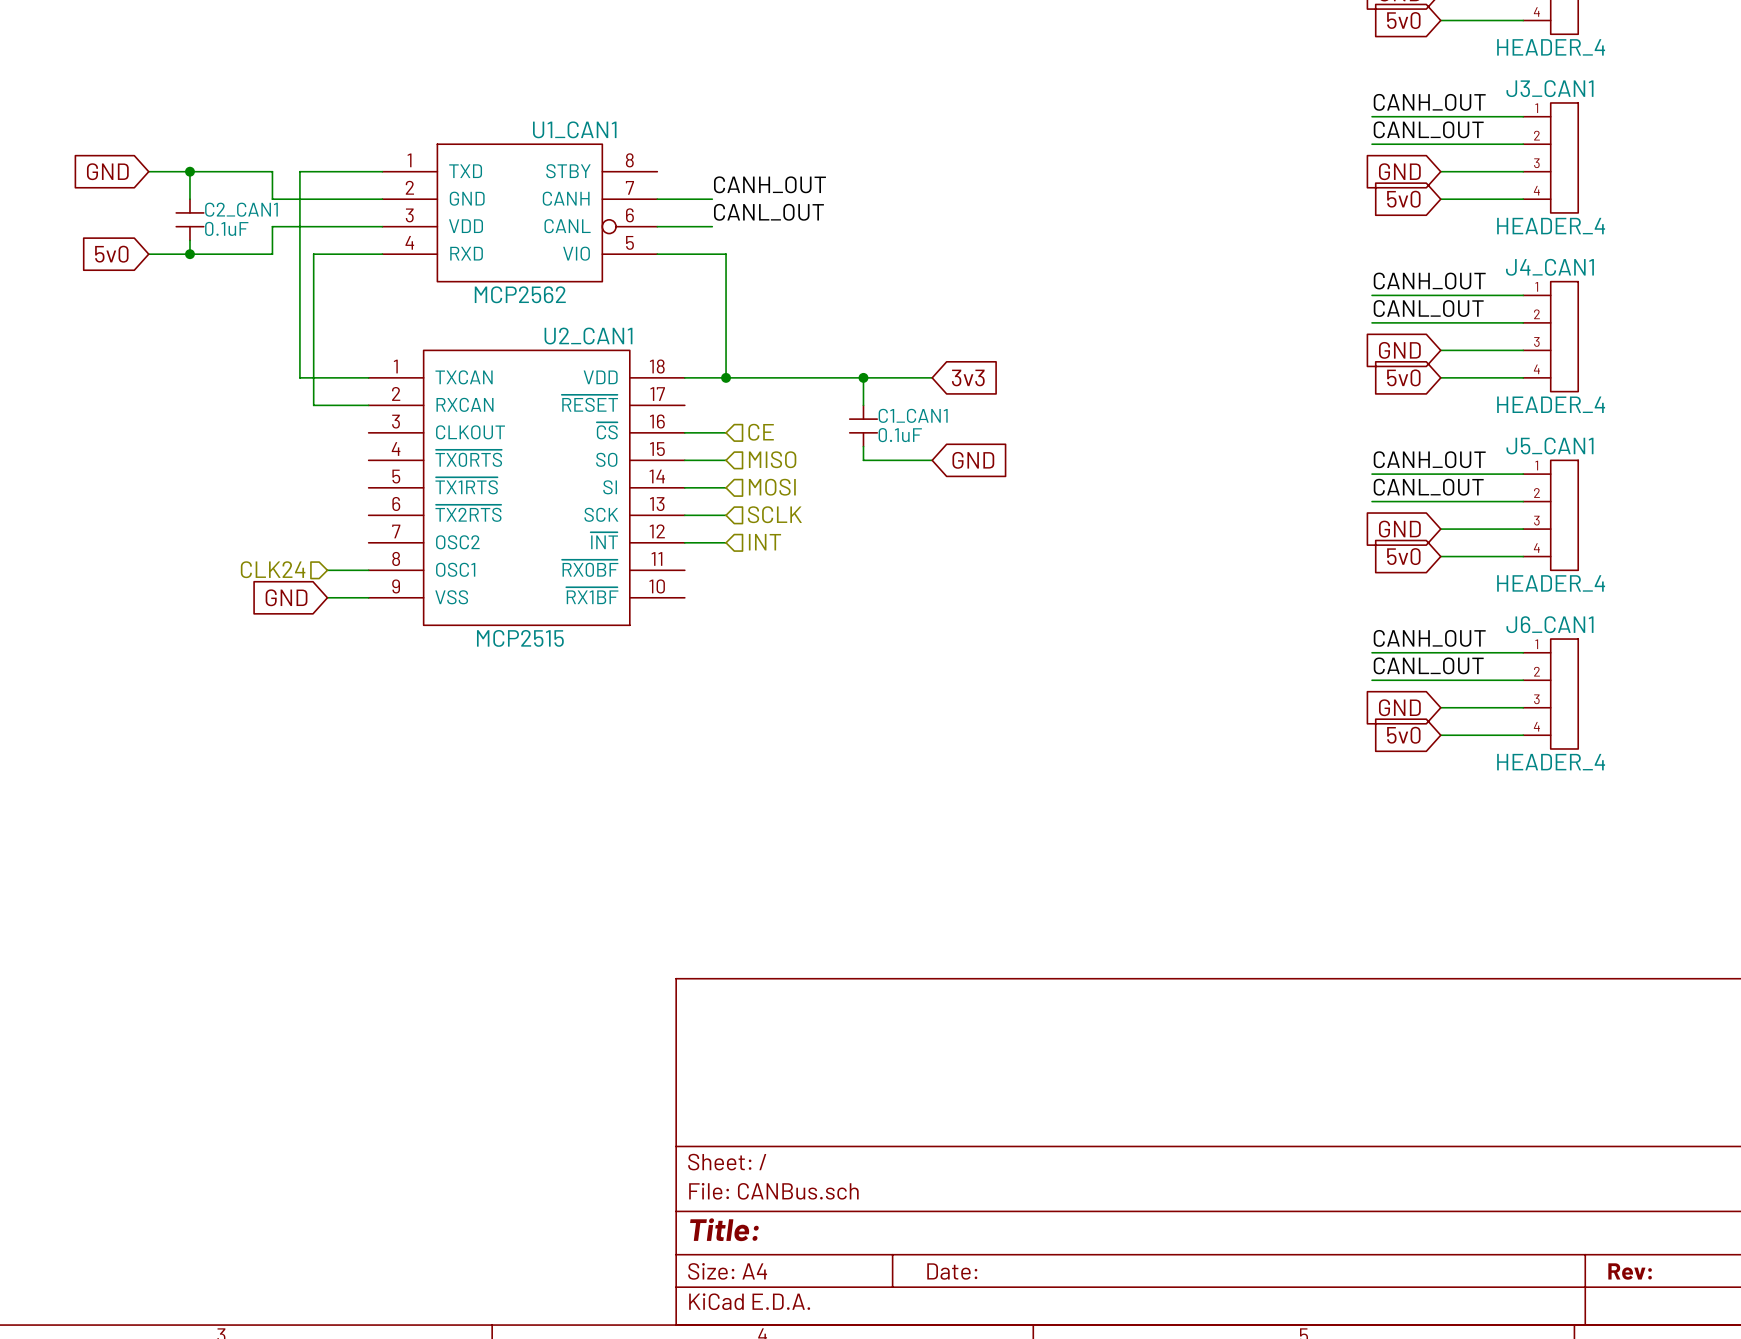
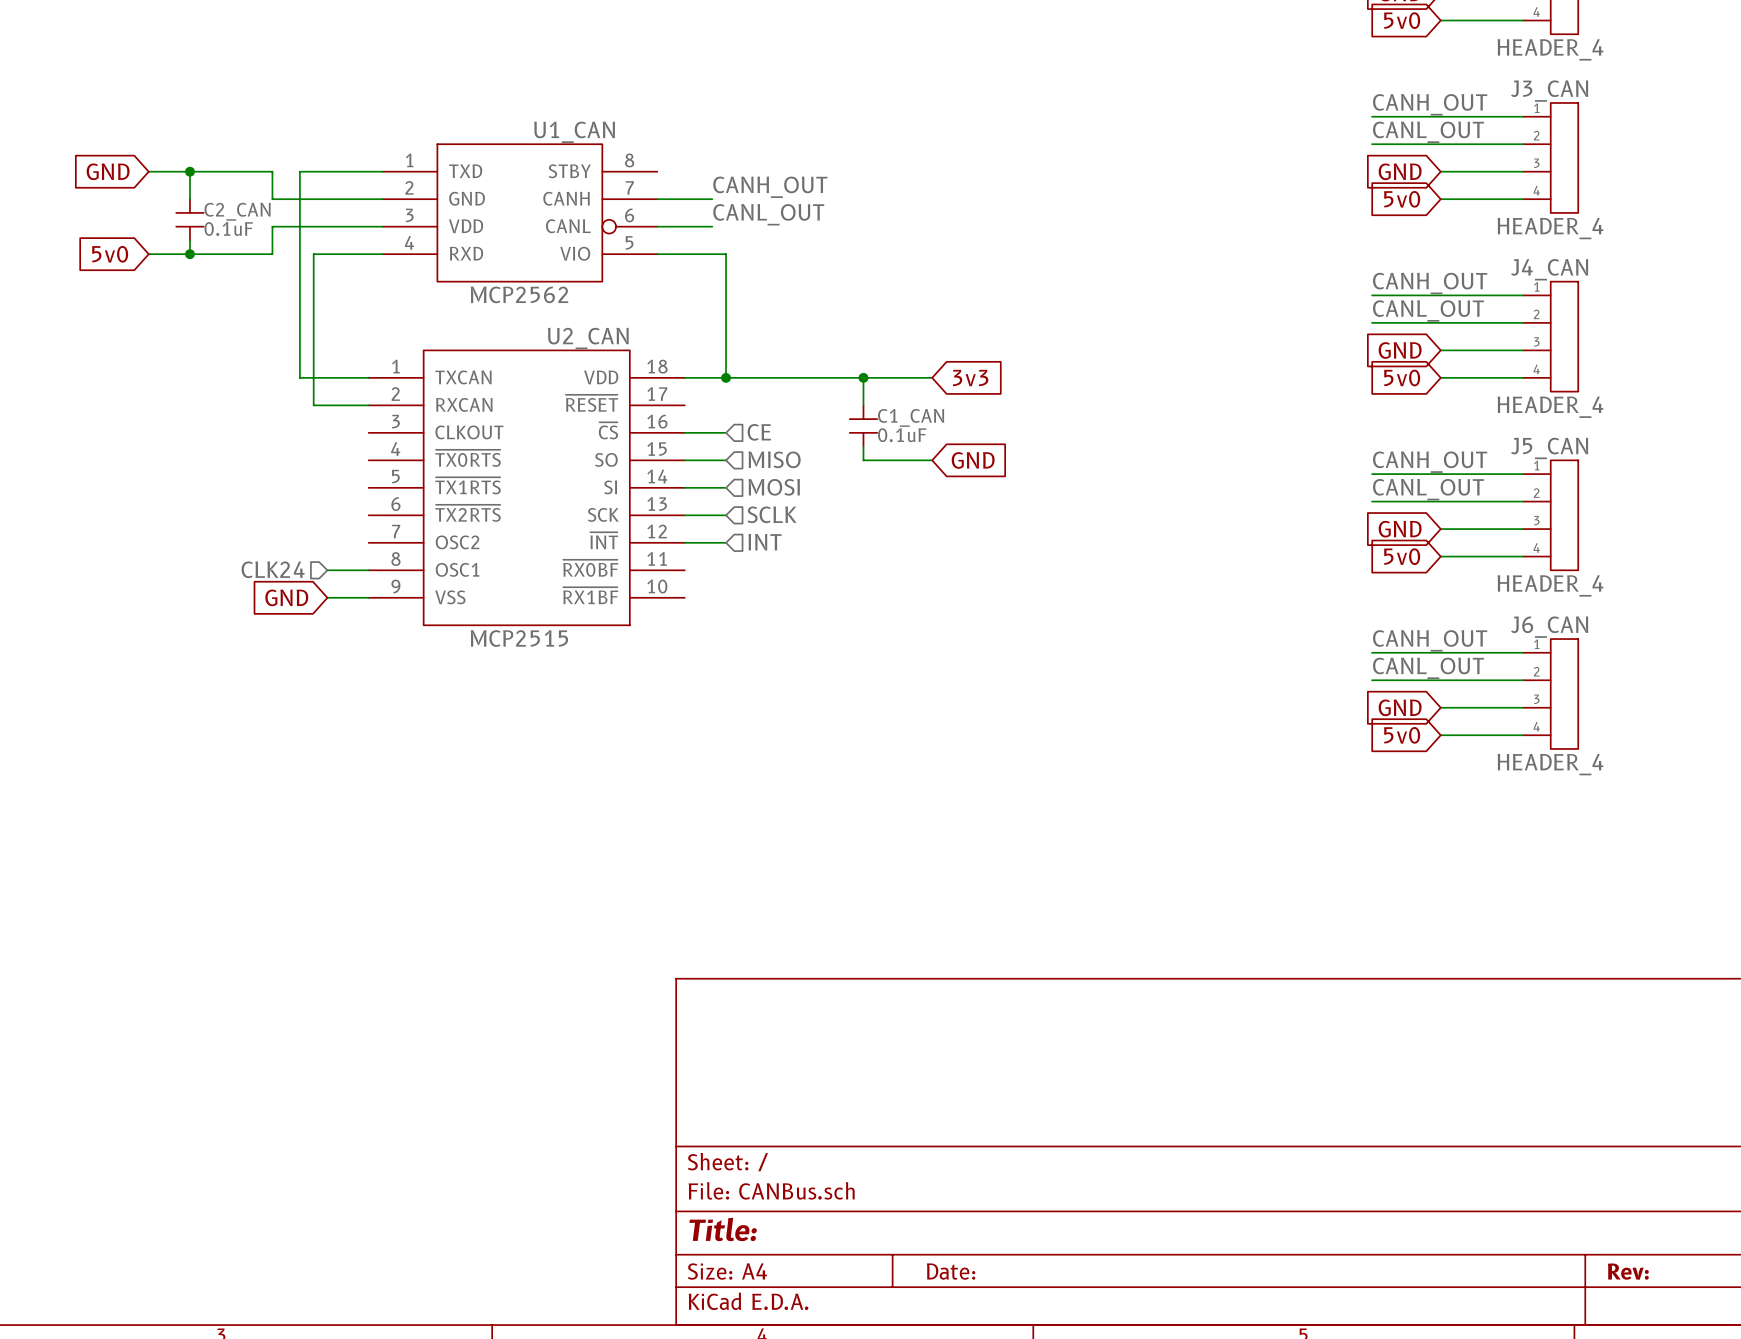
J3_CAN1 name: J3_CAN1 (1549, 88) -> J3_CAN (1549, 91)
U1_CAN1 name: U1_CAN1 (574, 129) -> U1_CAN (574, 132)
C2_CAN1 name: C2_CAN1 (241, 209) -> C2_CAN (237, 211)
J4_CAN1 name: J4_CAN1 (1549, 267) -> J4_CAN (1549, 269)
U2_CAN1 name: U2_CAN1 (588, 336) -> U2_CAN (588, 338)
C1_CAN1 name: C1_CAN1 (913, 415) -> C1_CAN (911, 417)
J5_CAN1 name: J5_CAN1 (1549, 446) -> J5_CAN (1549, 448)
J6_CAN1 name: J6_CAN1 (1549, 624) -> J6_CAN (1549, 627)

